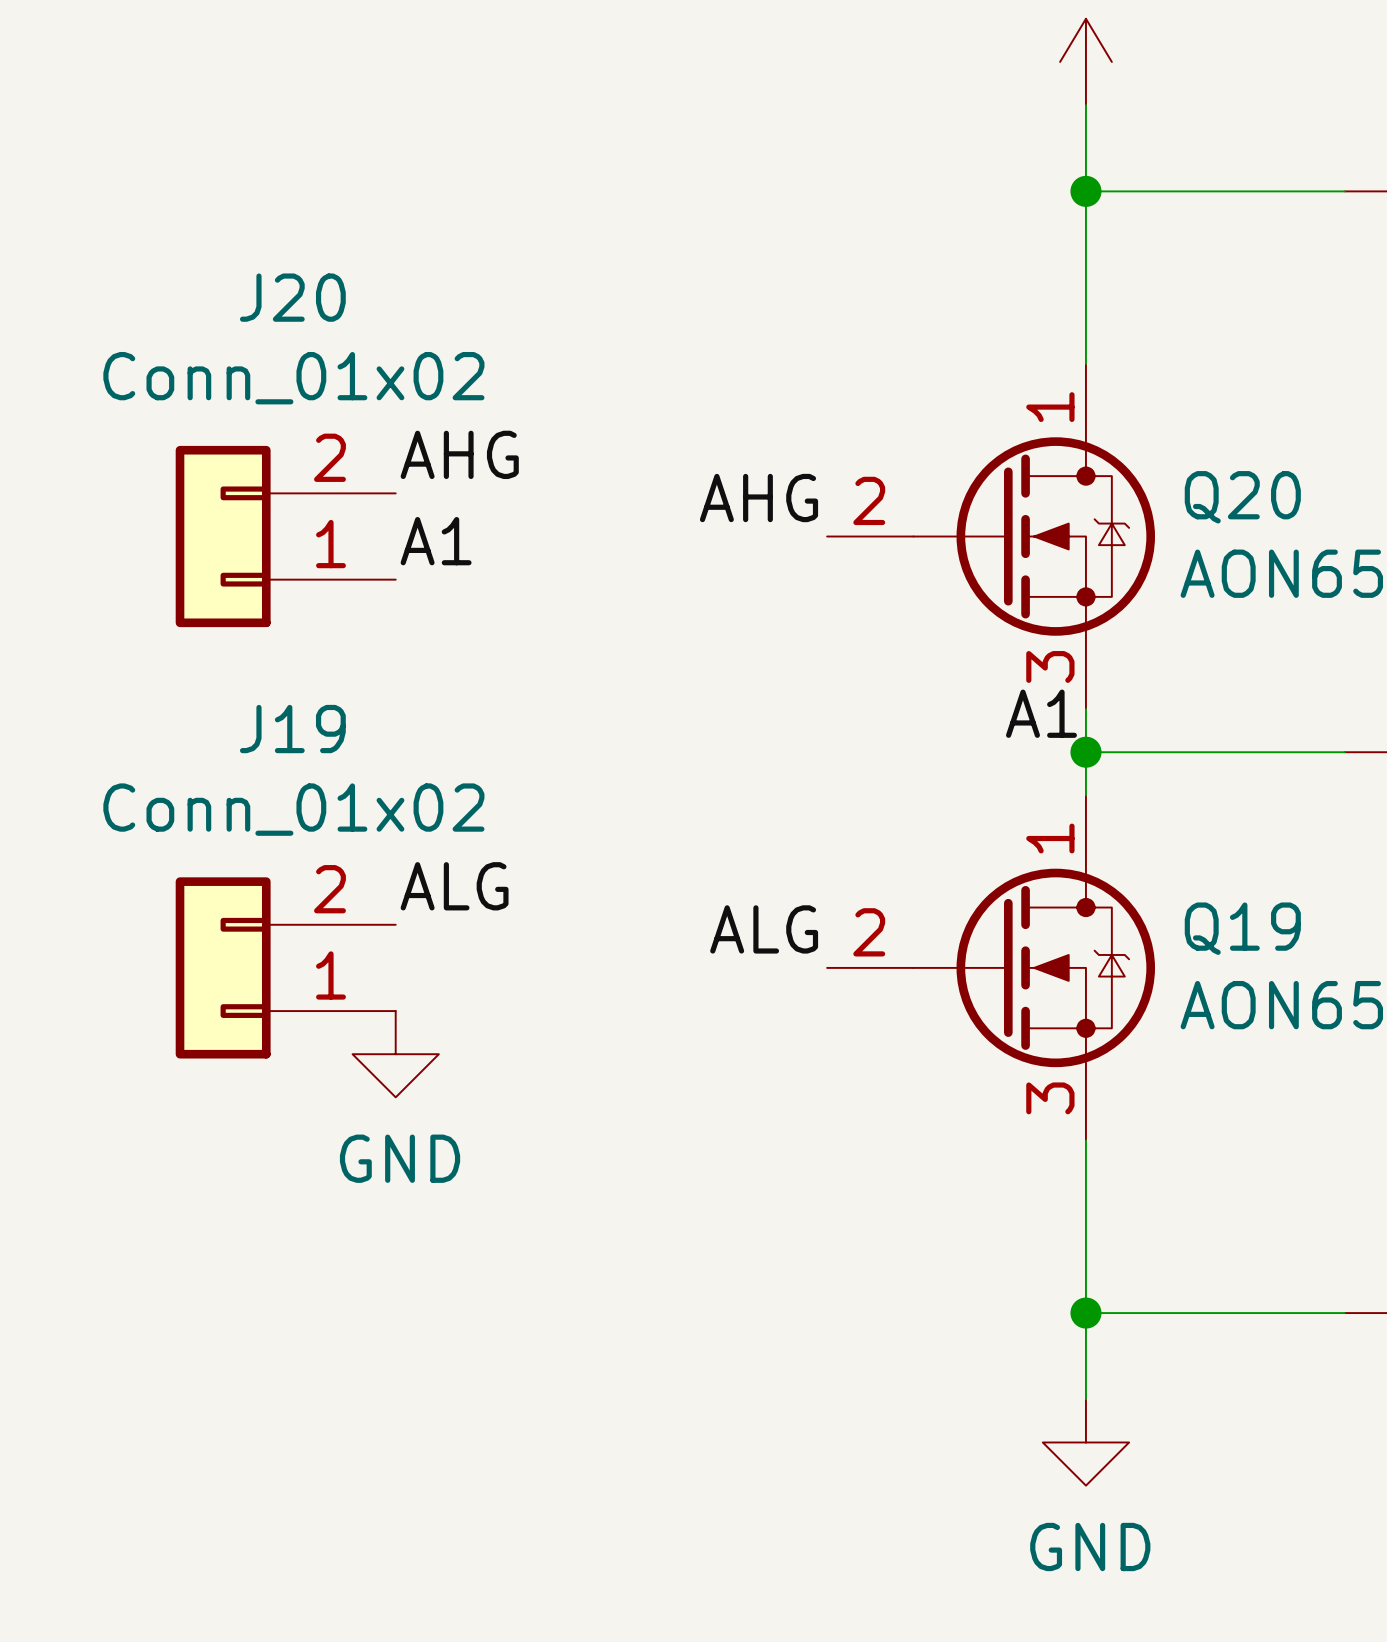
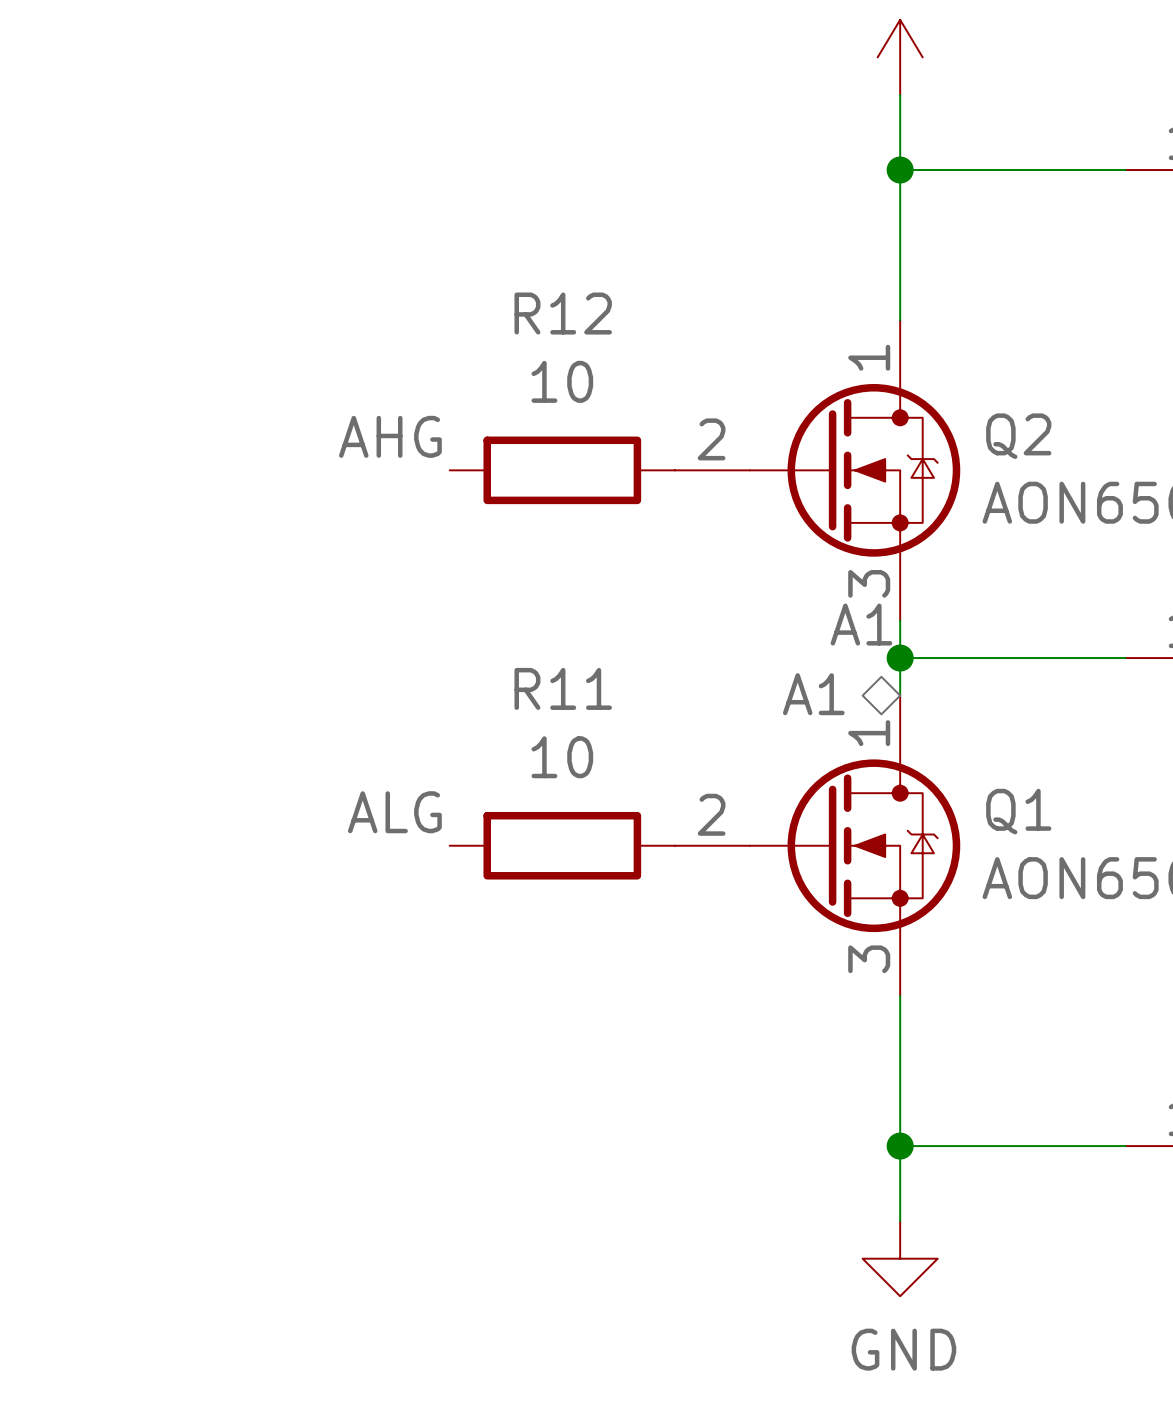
label position: AHG (459, 454) -> AHG (390, 436)
Q20 name: Q20 (1242, 497) -> Q2 (1018, 436)
label: AHG (759, 498) -> none
J20: Conn_01x02 (285, 536) -> none
R12: none -> 10 (562, 470)
label: A1 (436, 541) -> none
hierarchical label: none -> A1 (813, 694)
label position: ALG (454, 886) -> ALG (394, 812)
Q19 name: Q19 (1242, 928) -> Q1 (1018, 811)
label: ALG (764, 929) -> none
J19: Conn_01x02 (285, 967) -> none
R11: none -> 10 (562, 845)
power symbol: GND (395, 1054) -> none

